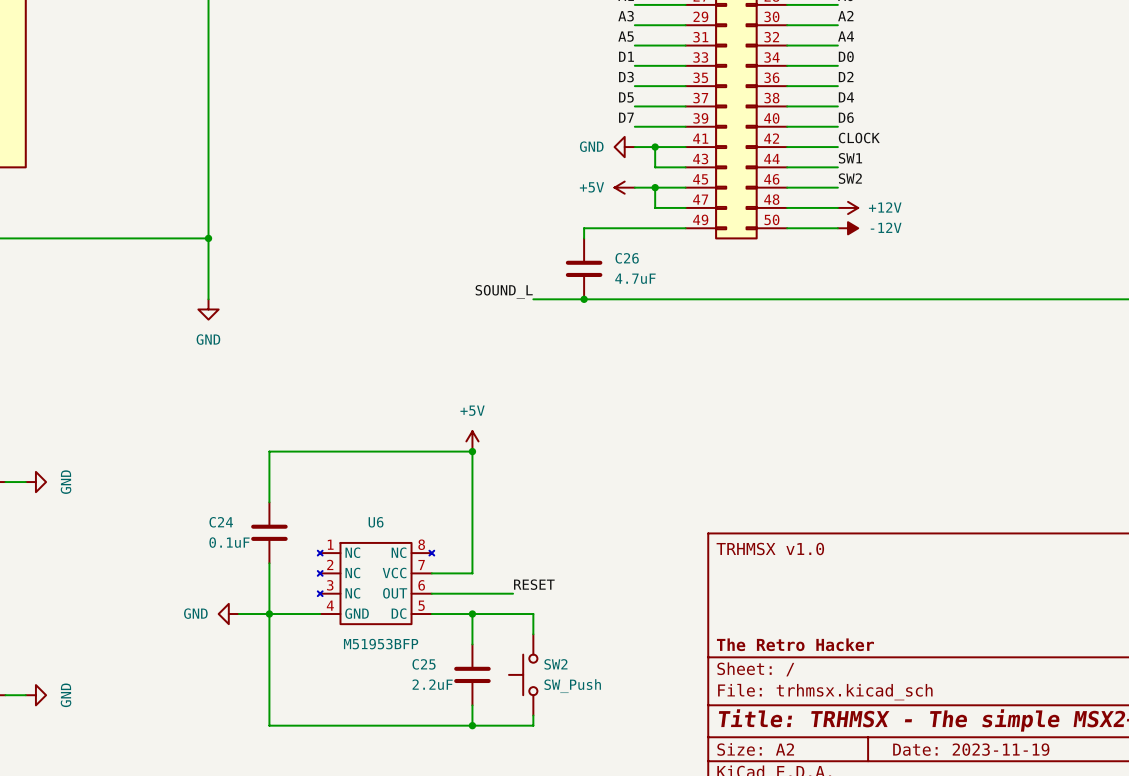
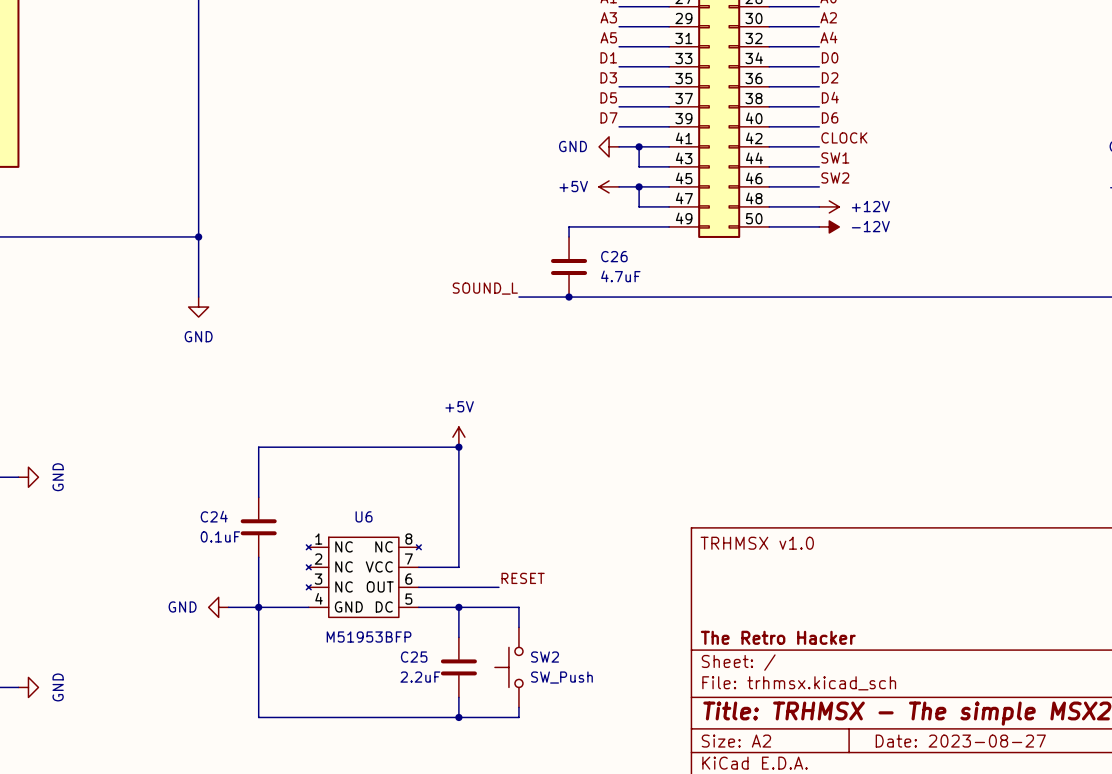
title block: Date: 2023-11-19 (971, 749) -> Date: 2023-08-27 (960, 741)

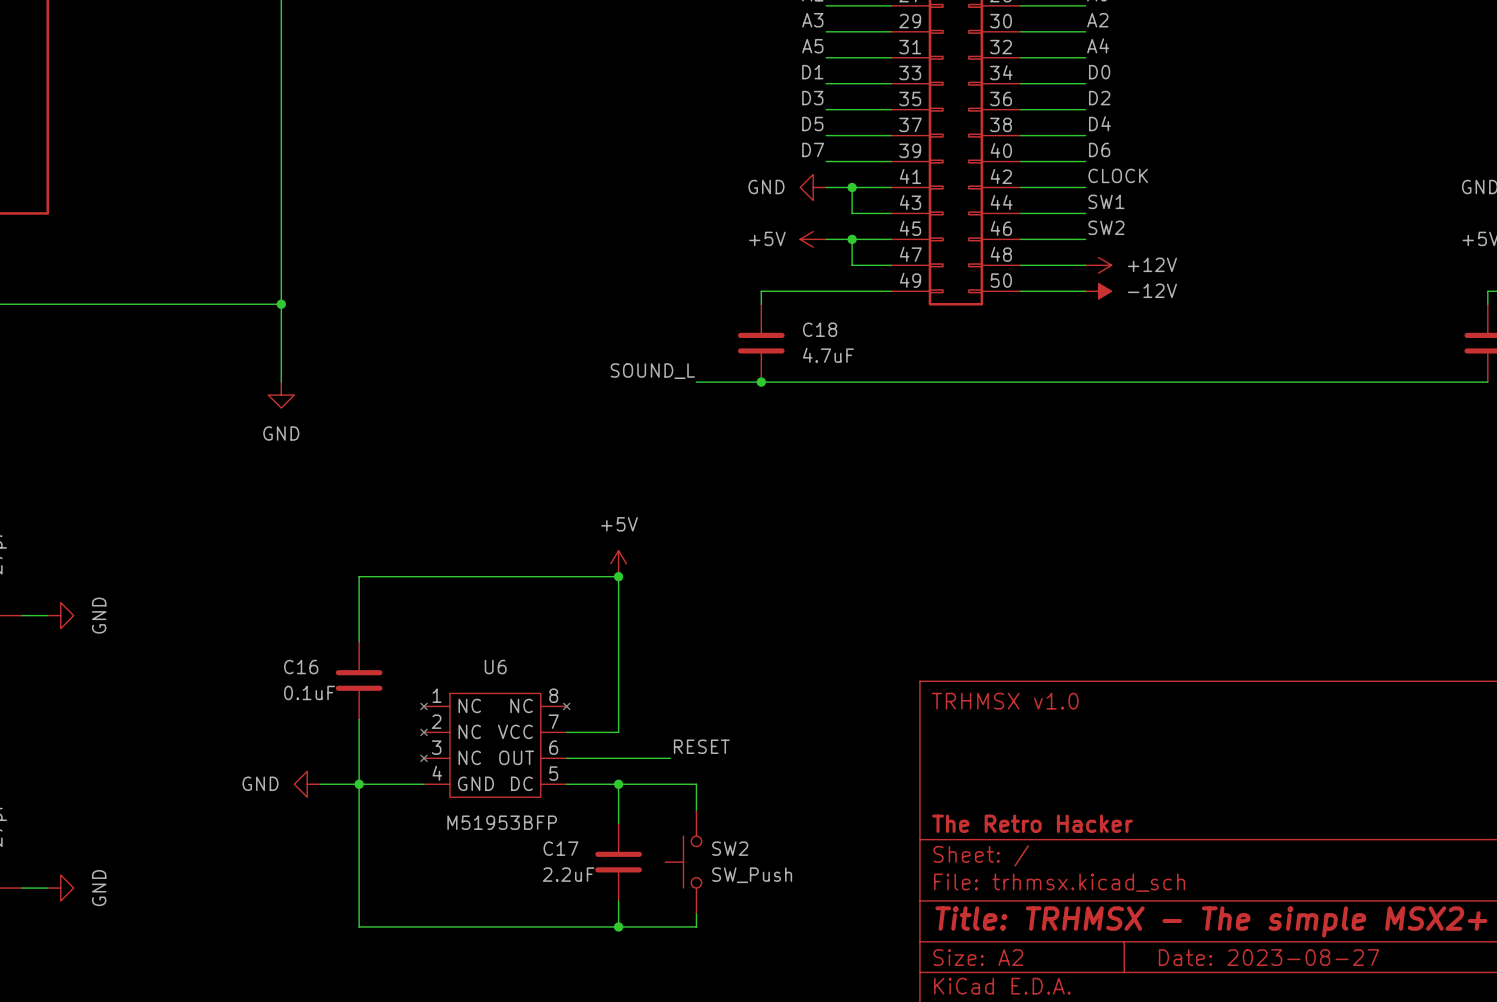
C26 name: C26 (614, 256) -> C18 (820, 329)
C24 name: C24 (214, 516) -> C16 (301, 667)
C25 name: C25 (414, 657) -> C17 (560, 848)

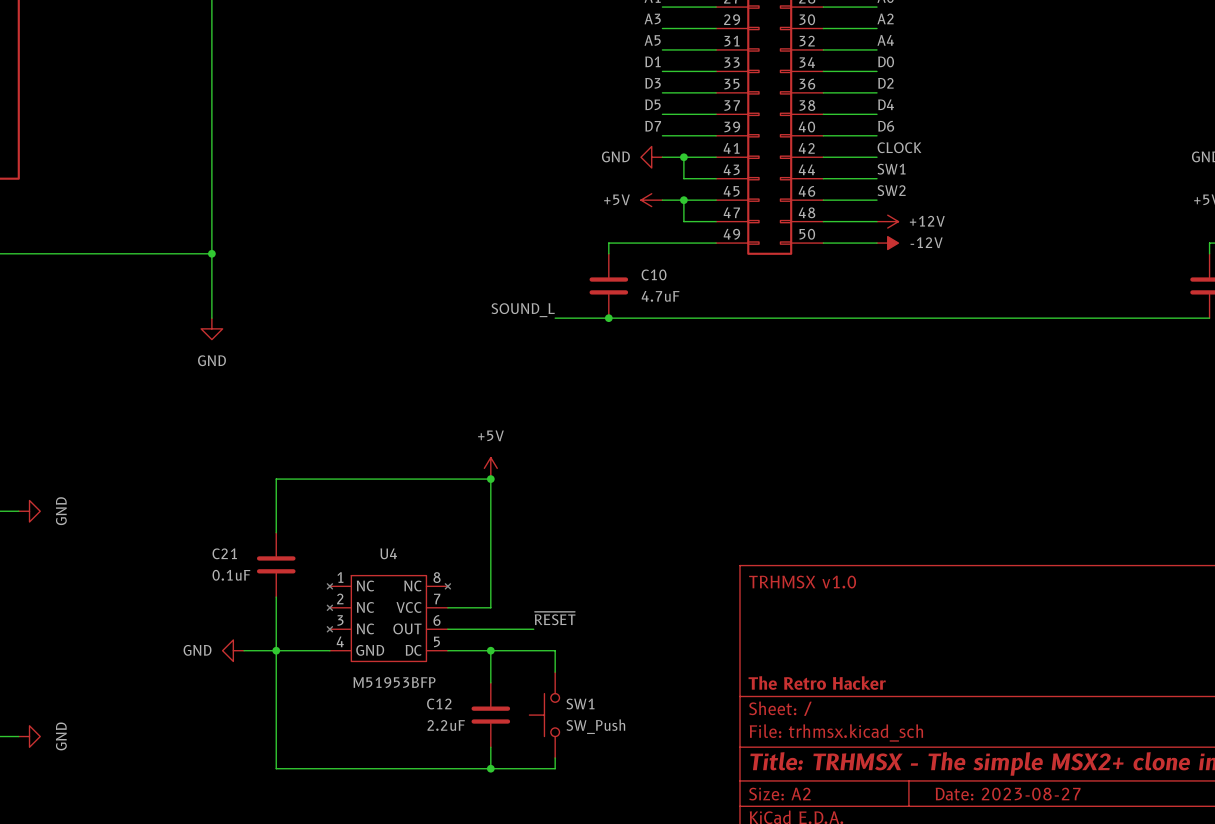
C18 name: C18 (820, 329) -> C10 (654, 274)
C16 name: C16 (301, 667) -> C21 (224, 553)
U6 name: U6 (495, 667) -> U4 (388, 553)
label: RESET (701, 746) -> ~{RESET} (555, 618)
C17 name: C17 (560, 848) -> C12 (439, 704)
SW2 name: SW2 (730, 848) -> SW1 (580, 704)

